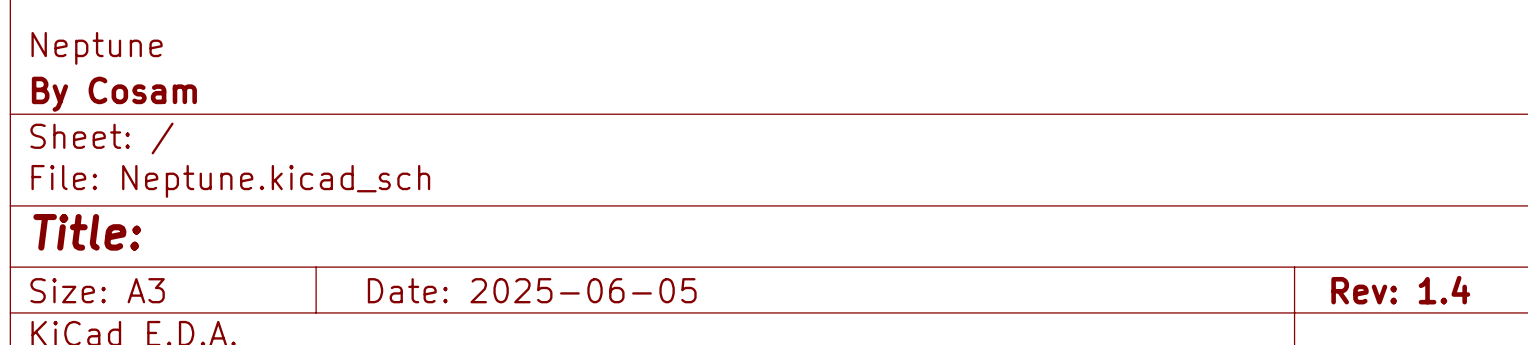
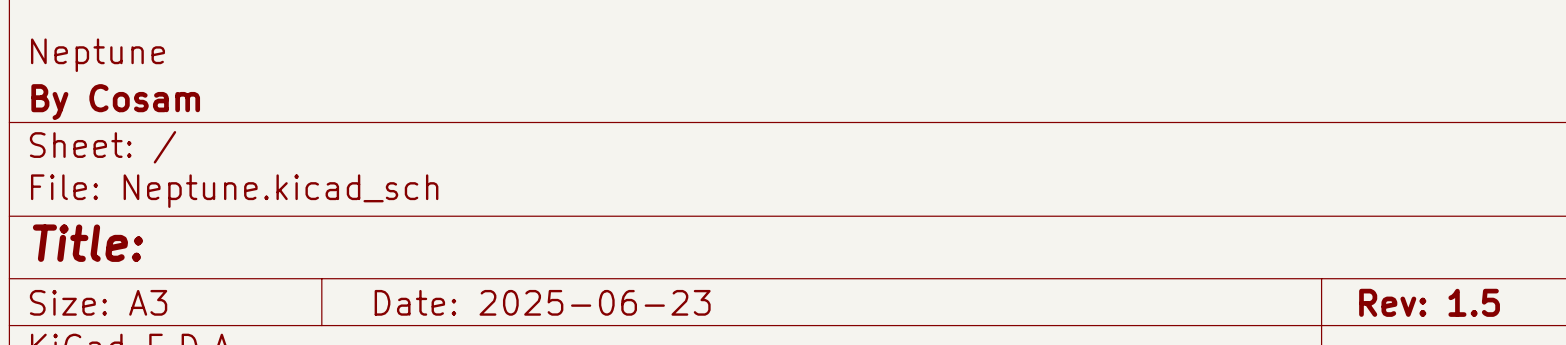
title block: Date: 2025-06-05 (532, 290) -> Date: 2025-06-23 (542, 302)
title block: Rev: 1.4 (1400, 290) -> Rev: 1.5 (1429, 302)

